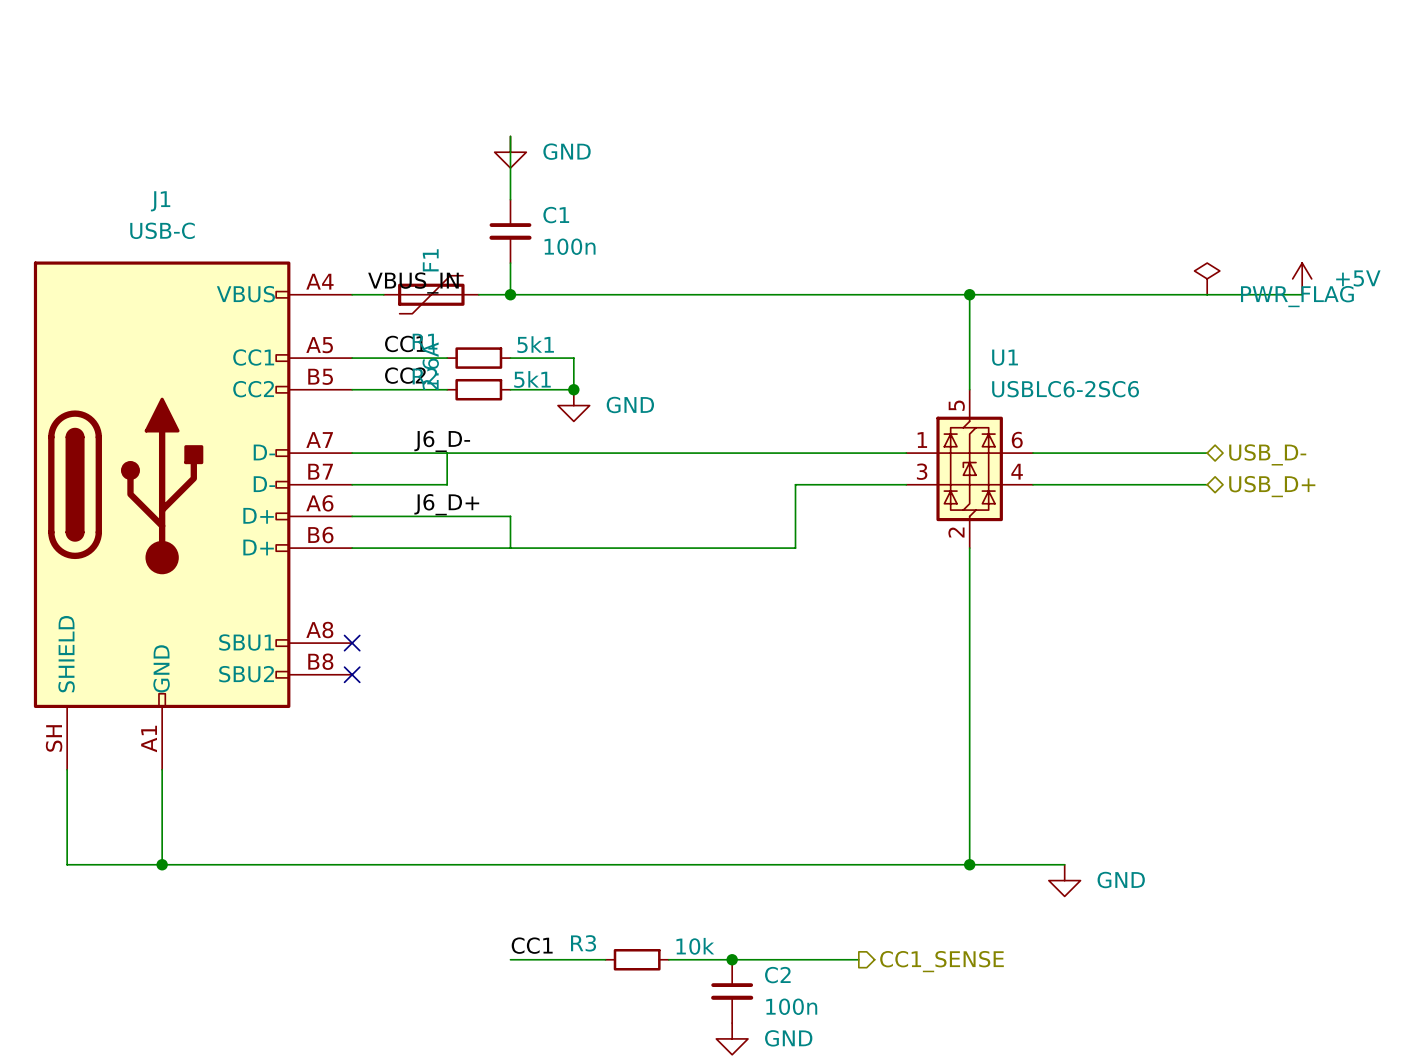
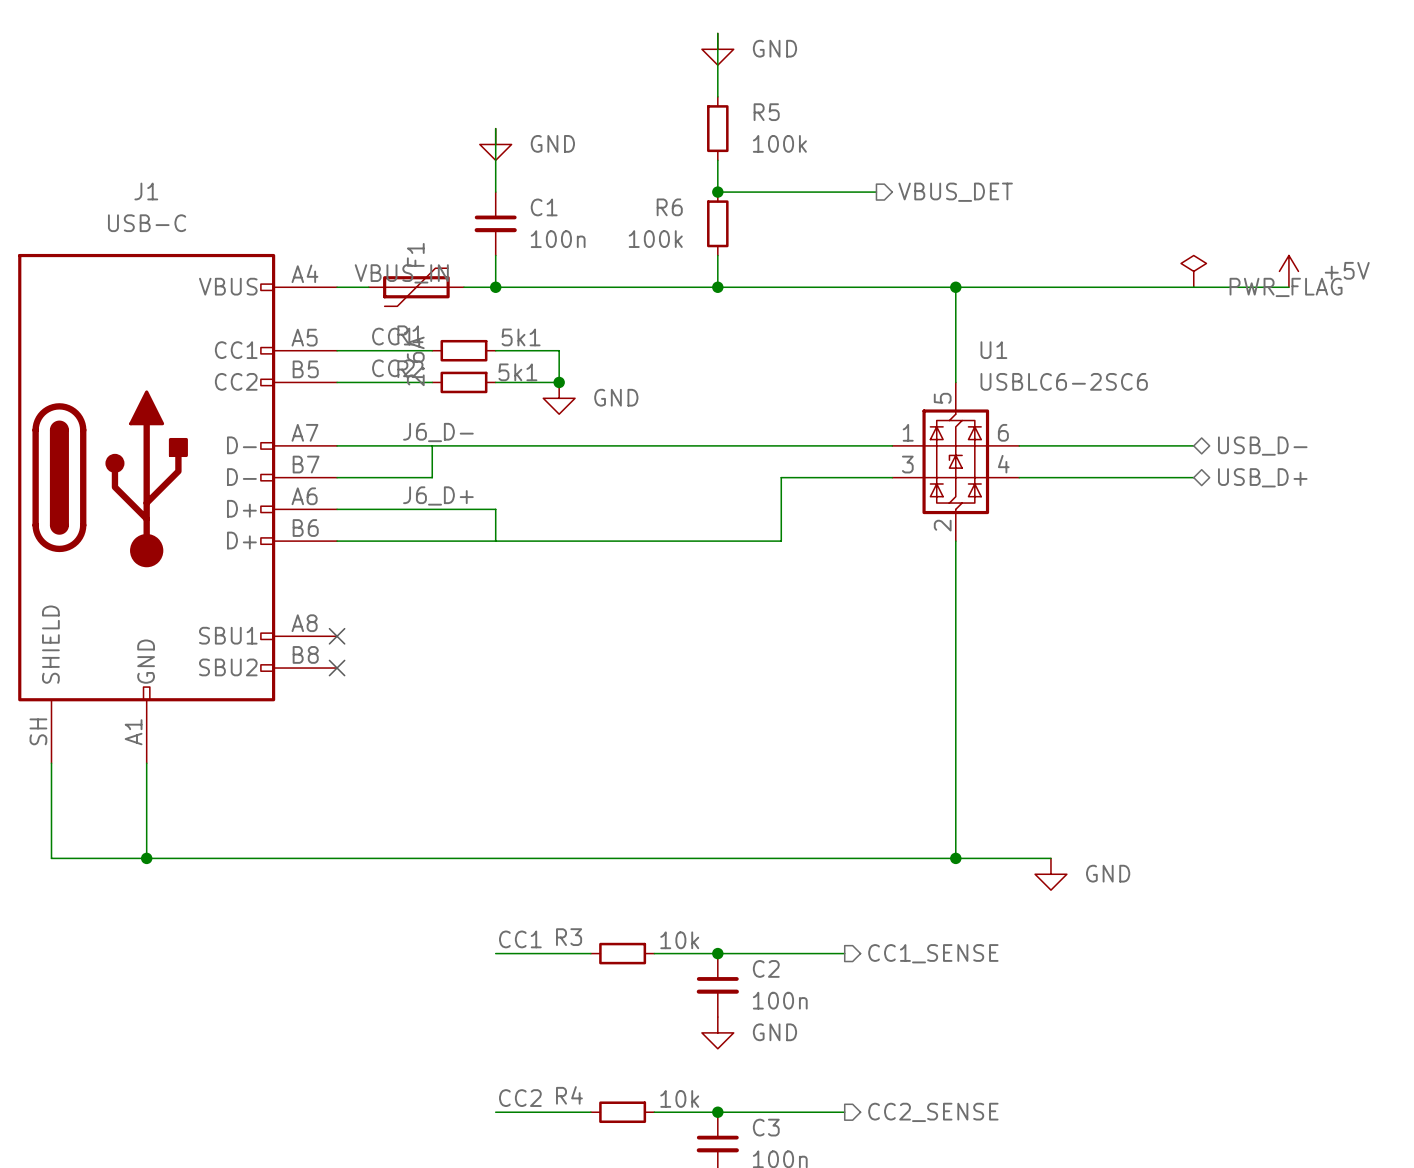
wire: none -> (717, 33) (717, 96)
power symbol: none -> GND (717, 49)
R5: none -> 100k (717, 128)
wire: none -> (717, 160) (717, 192) (876, 192)
junction: none -> (717, 192)
hierarchical label: none -> VBUS_DET (955, 192)
R6: none -> 100k (717, 223)
wire: none -> (717, 255) (717, 287)
junction: none -> (717, 287)

